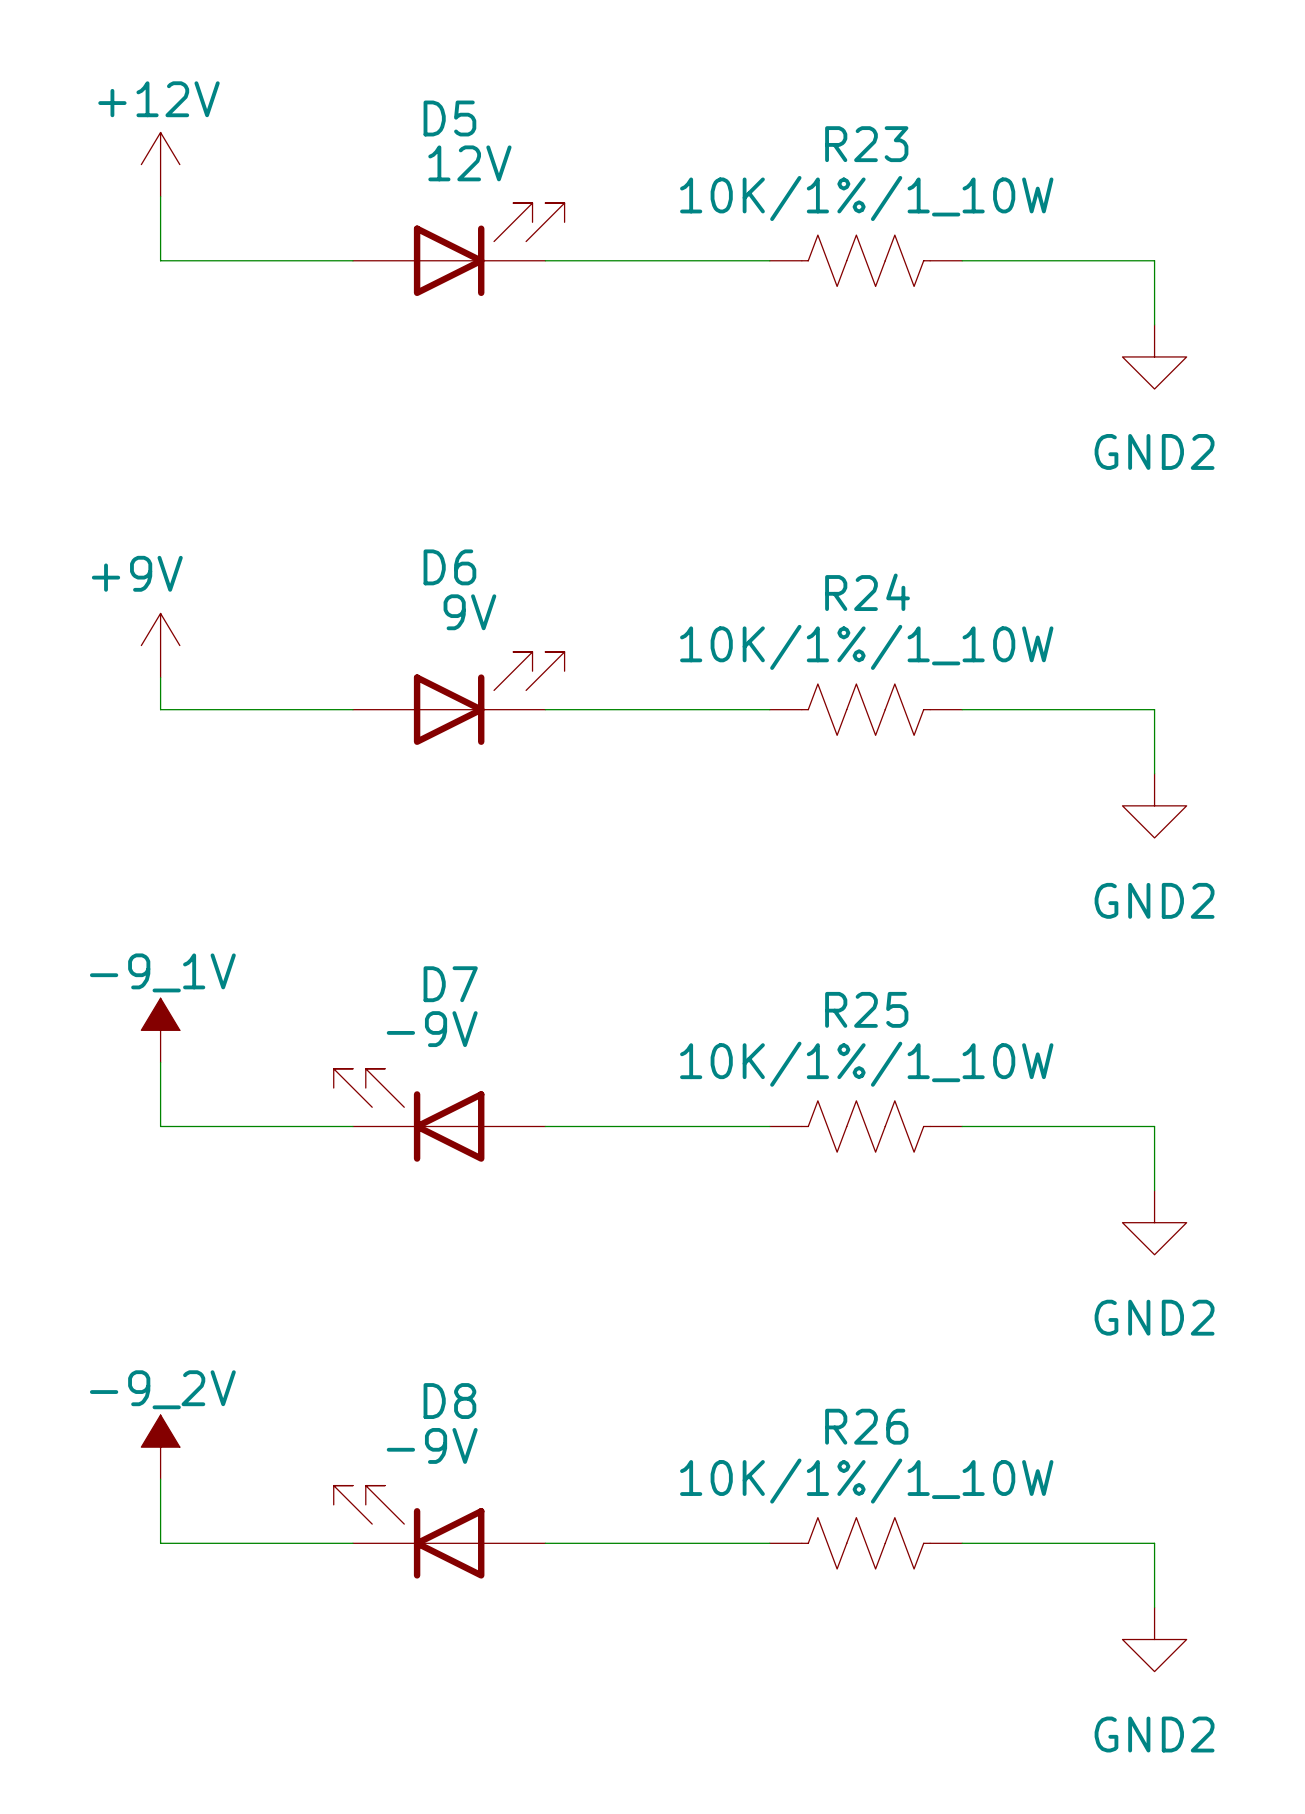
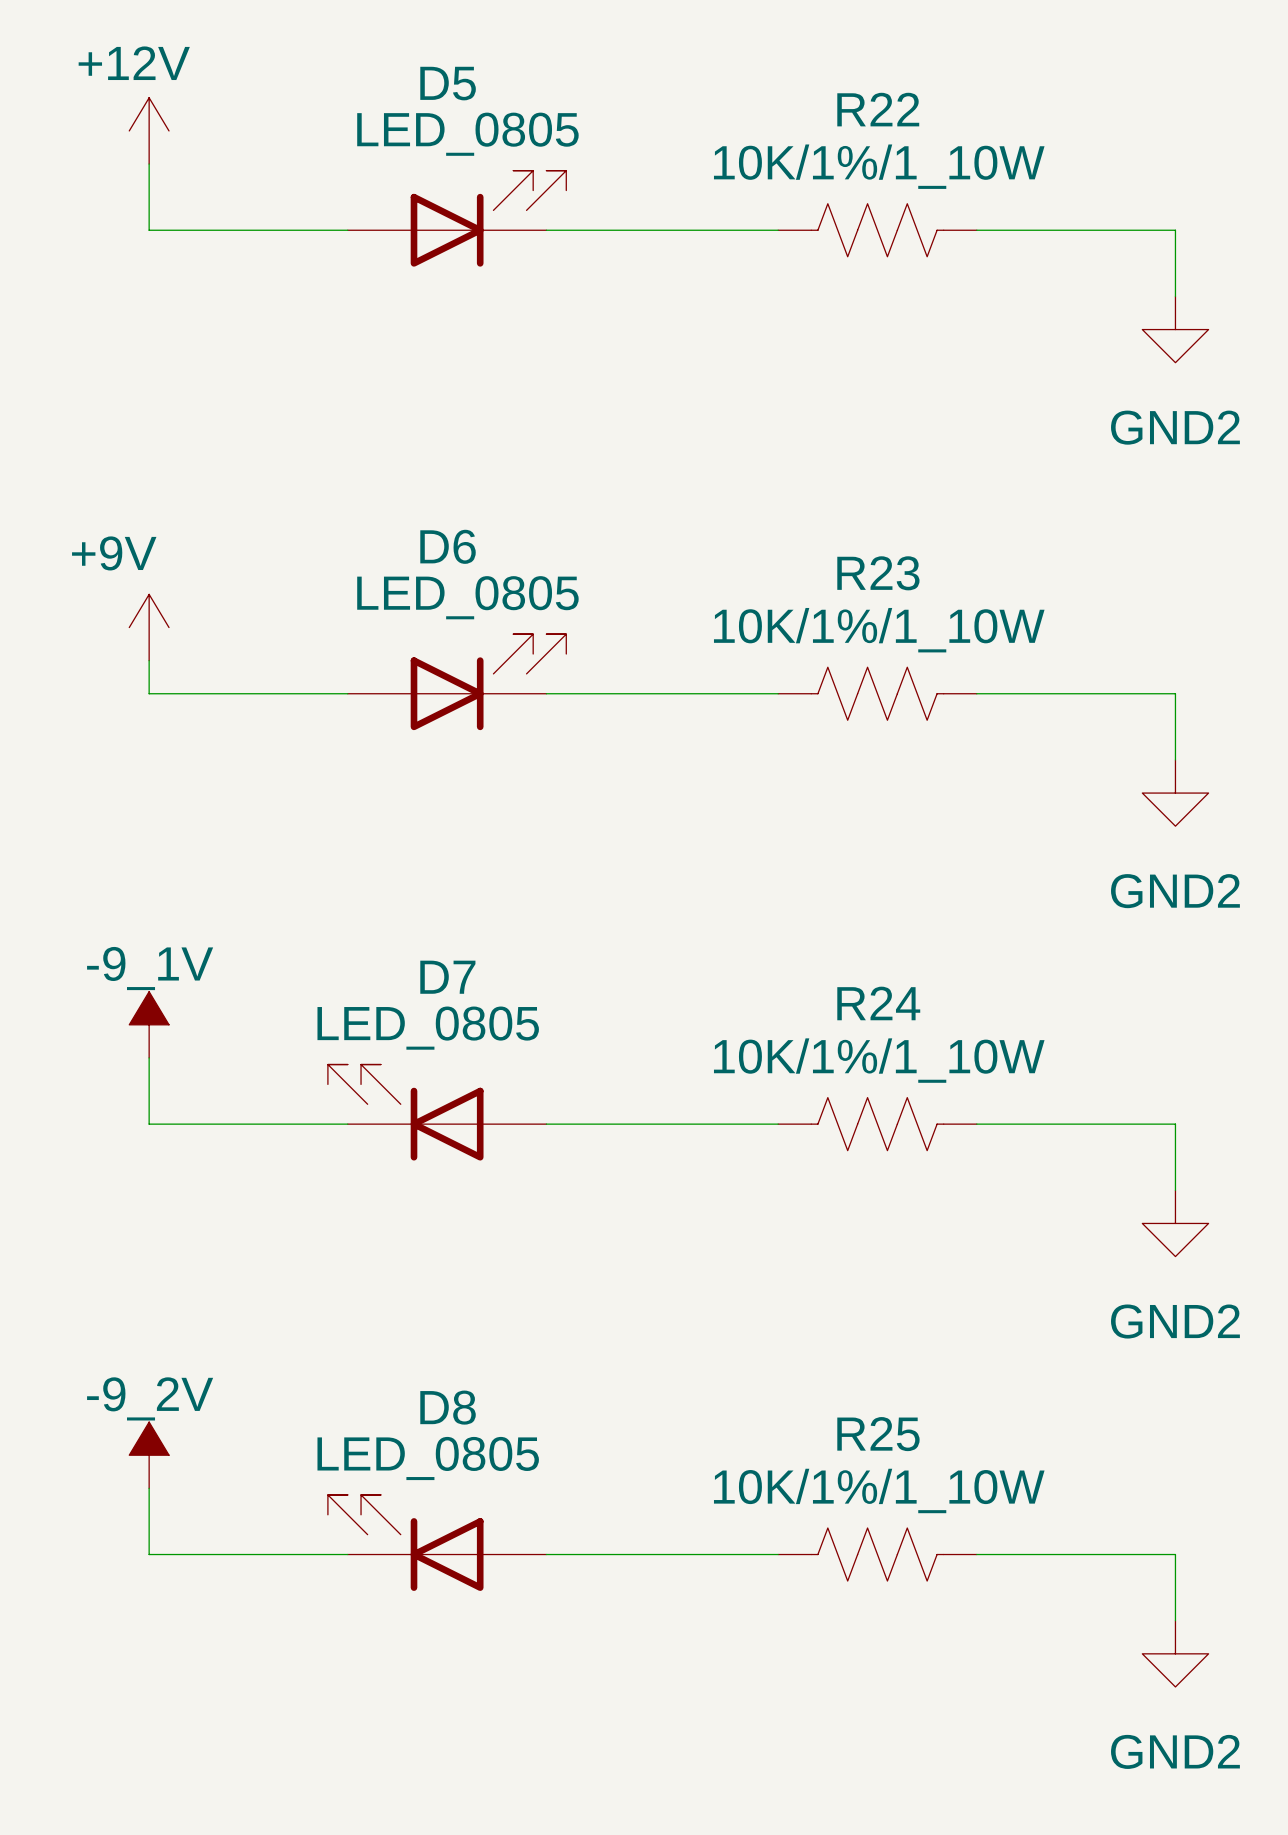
R23 name: R23 (866, 144) -> R22 (878, 109)
D5 value: 12V (469, 163) -> LED_0805 (467, 134)
R24 name: R24 (867, 592) -> R23 (878, 573)
D6 value: 9V (469, 612) -> LED_0805 (467, 597)
R25 name: R25 (866, 1009) -> R24 (878, 1003)
D7 value: -9V (432, 1029) -> LED_0805 (428, 1028)
R26 name: R26 (866, 1426) -> R25 (878, 1434)
D8 value: -9V (432, 1445) -> LED_0805 (428, 1458)

